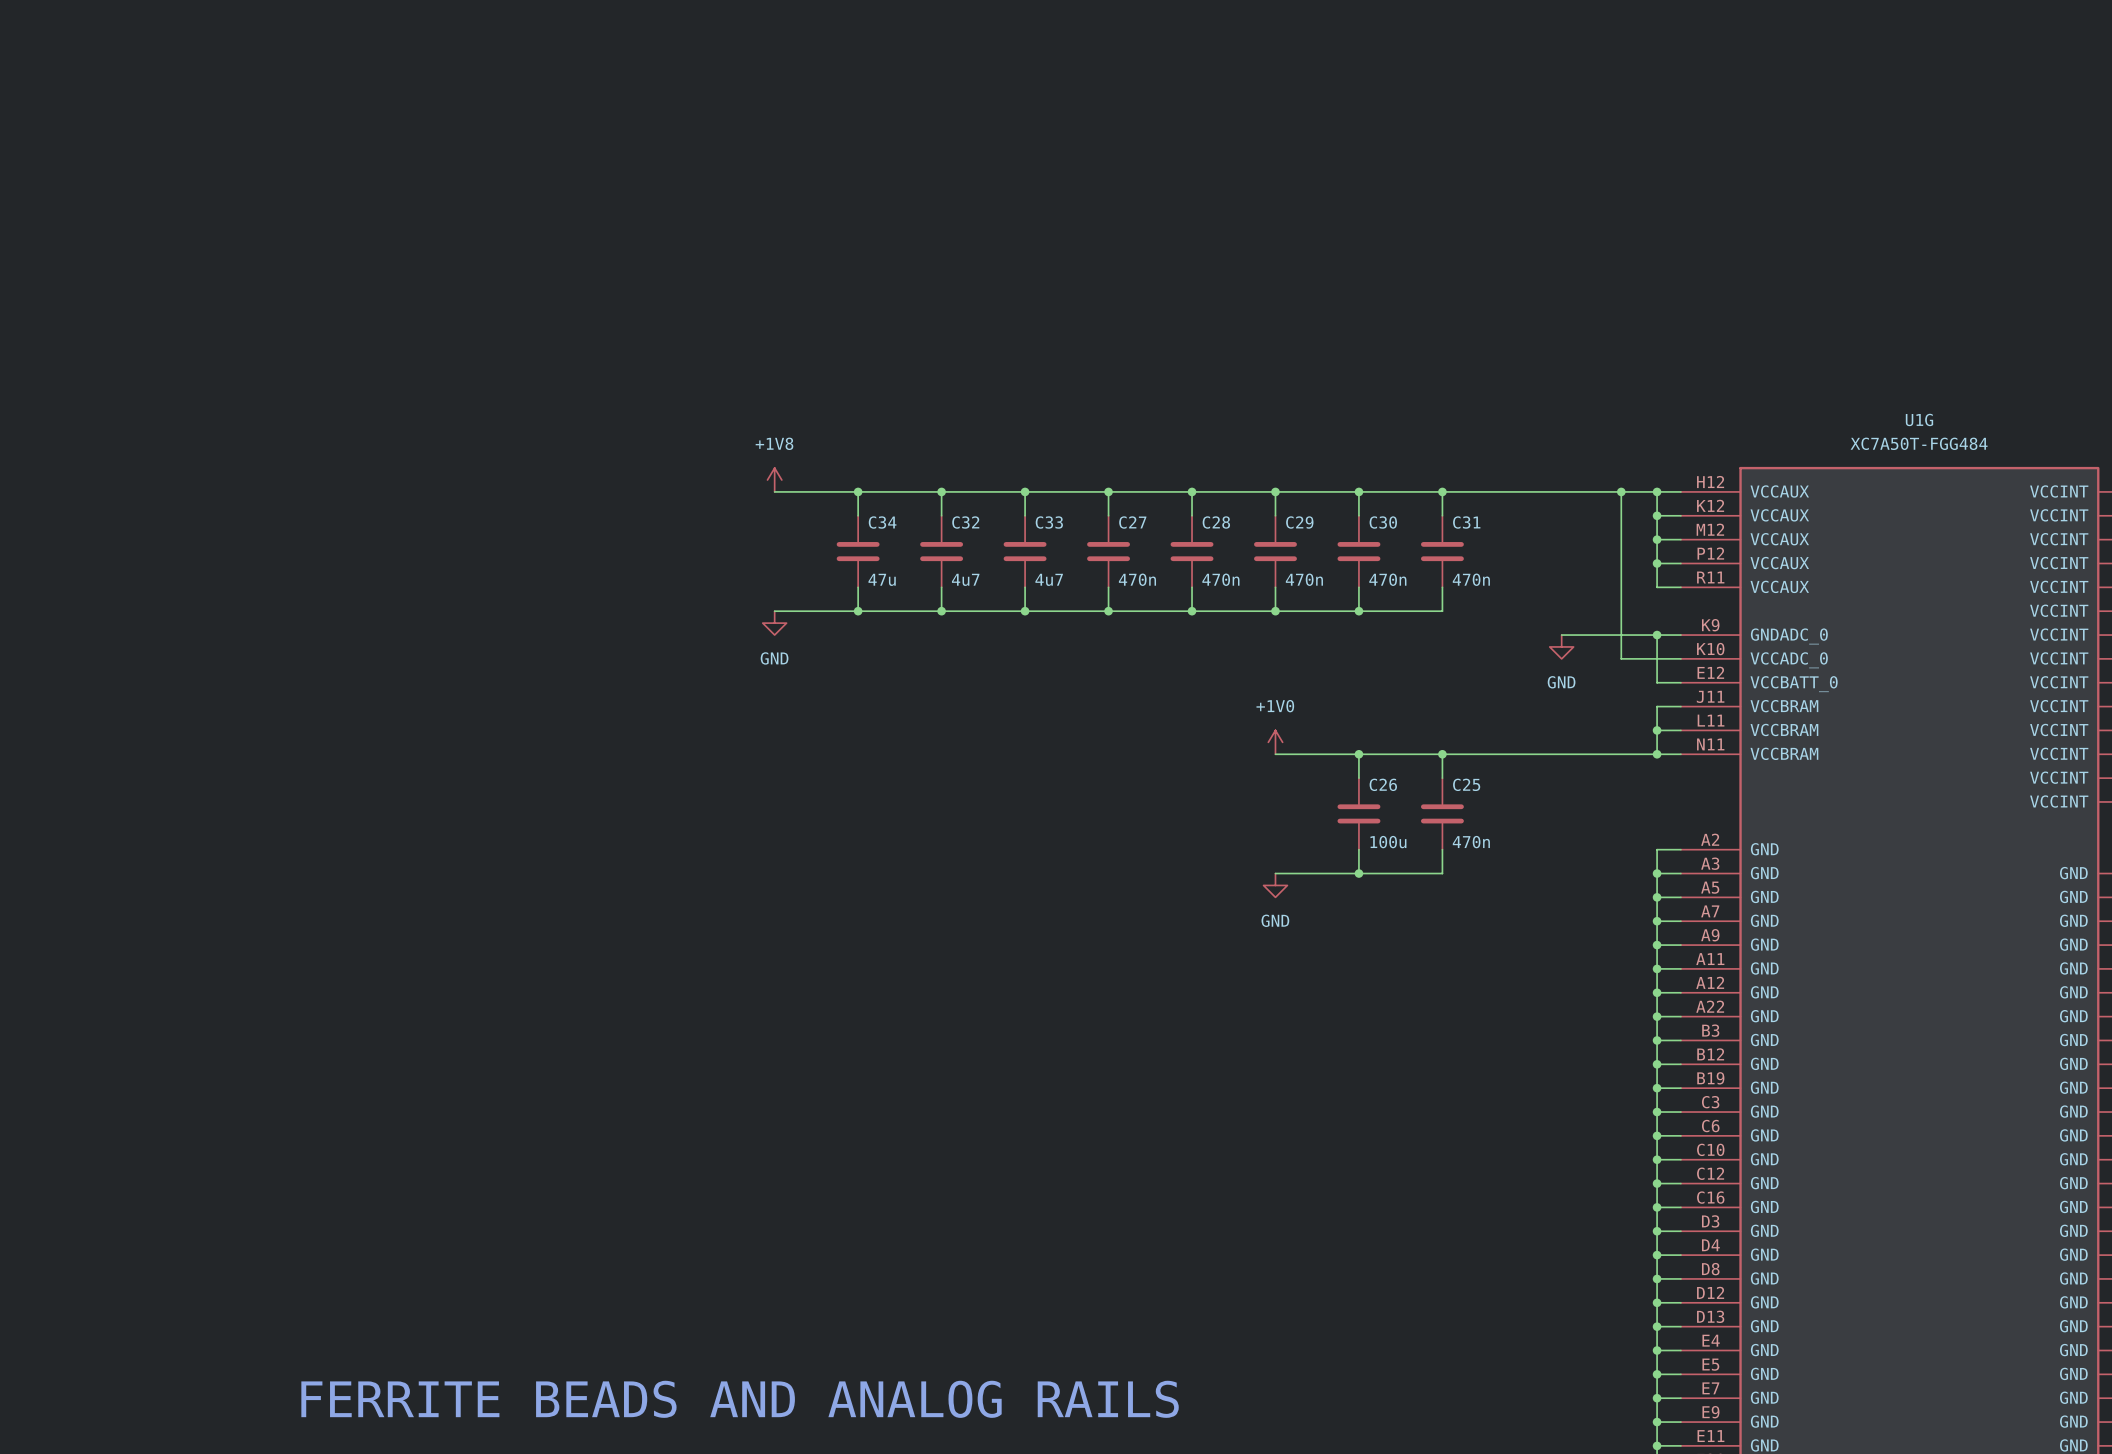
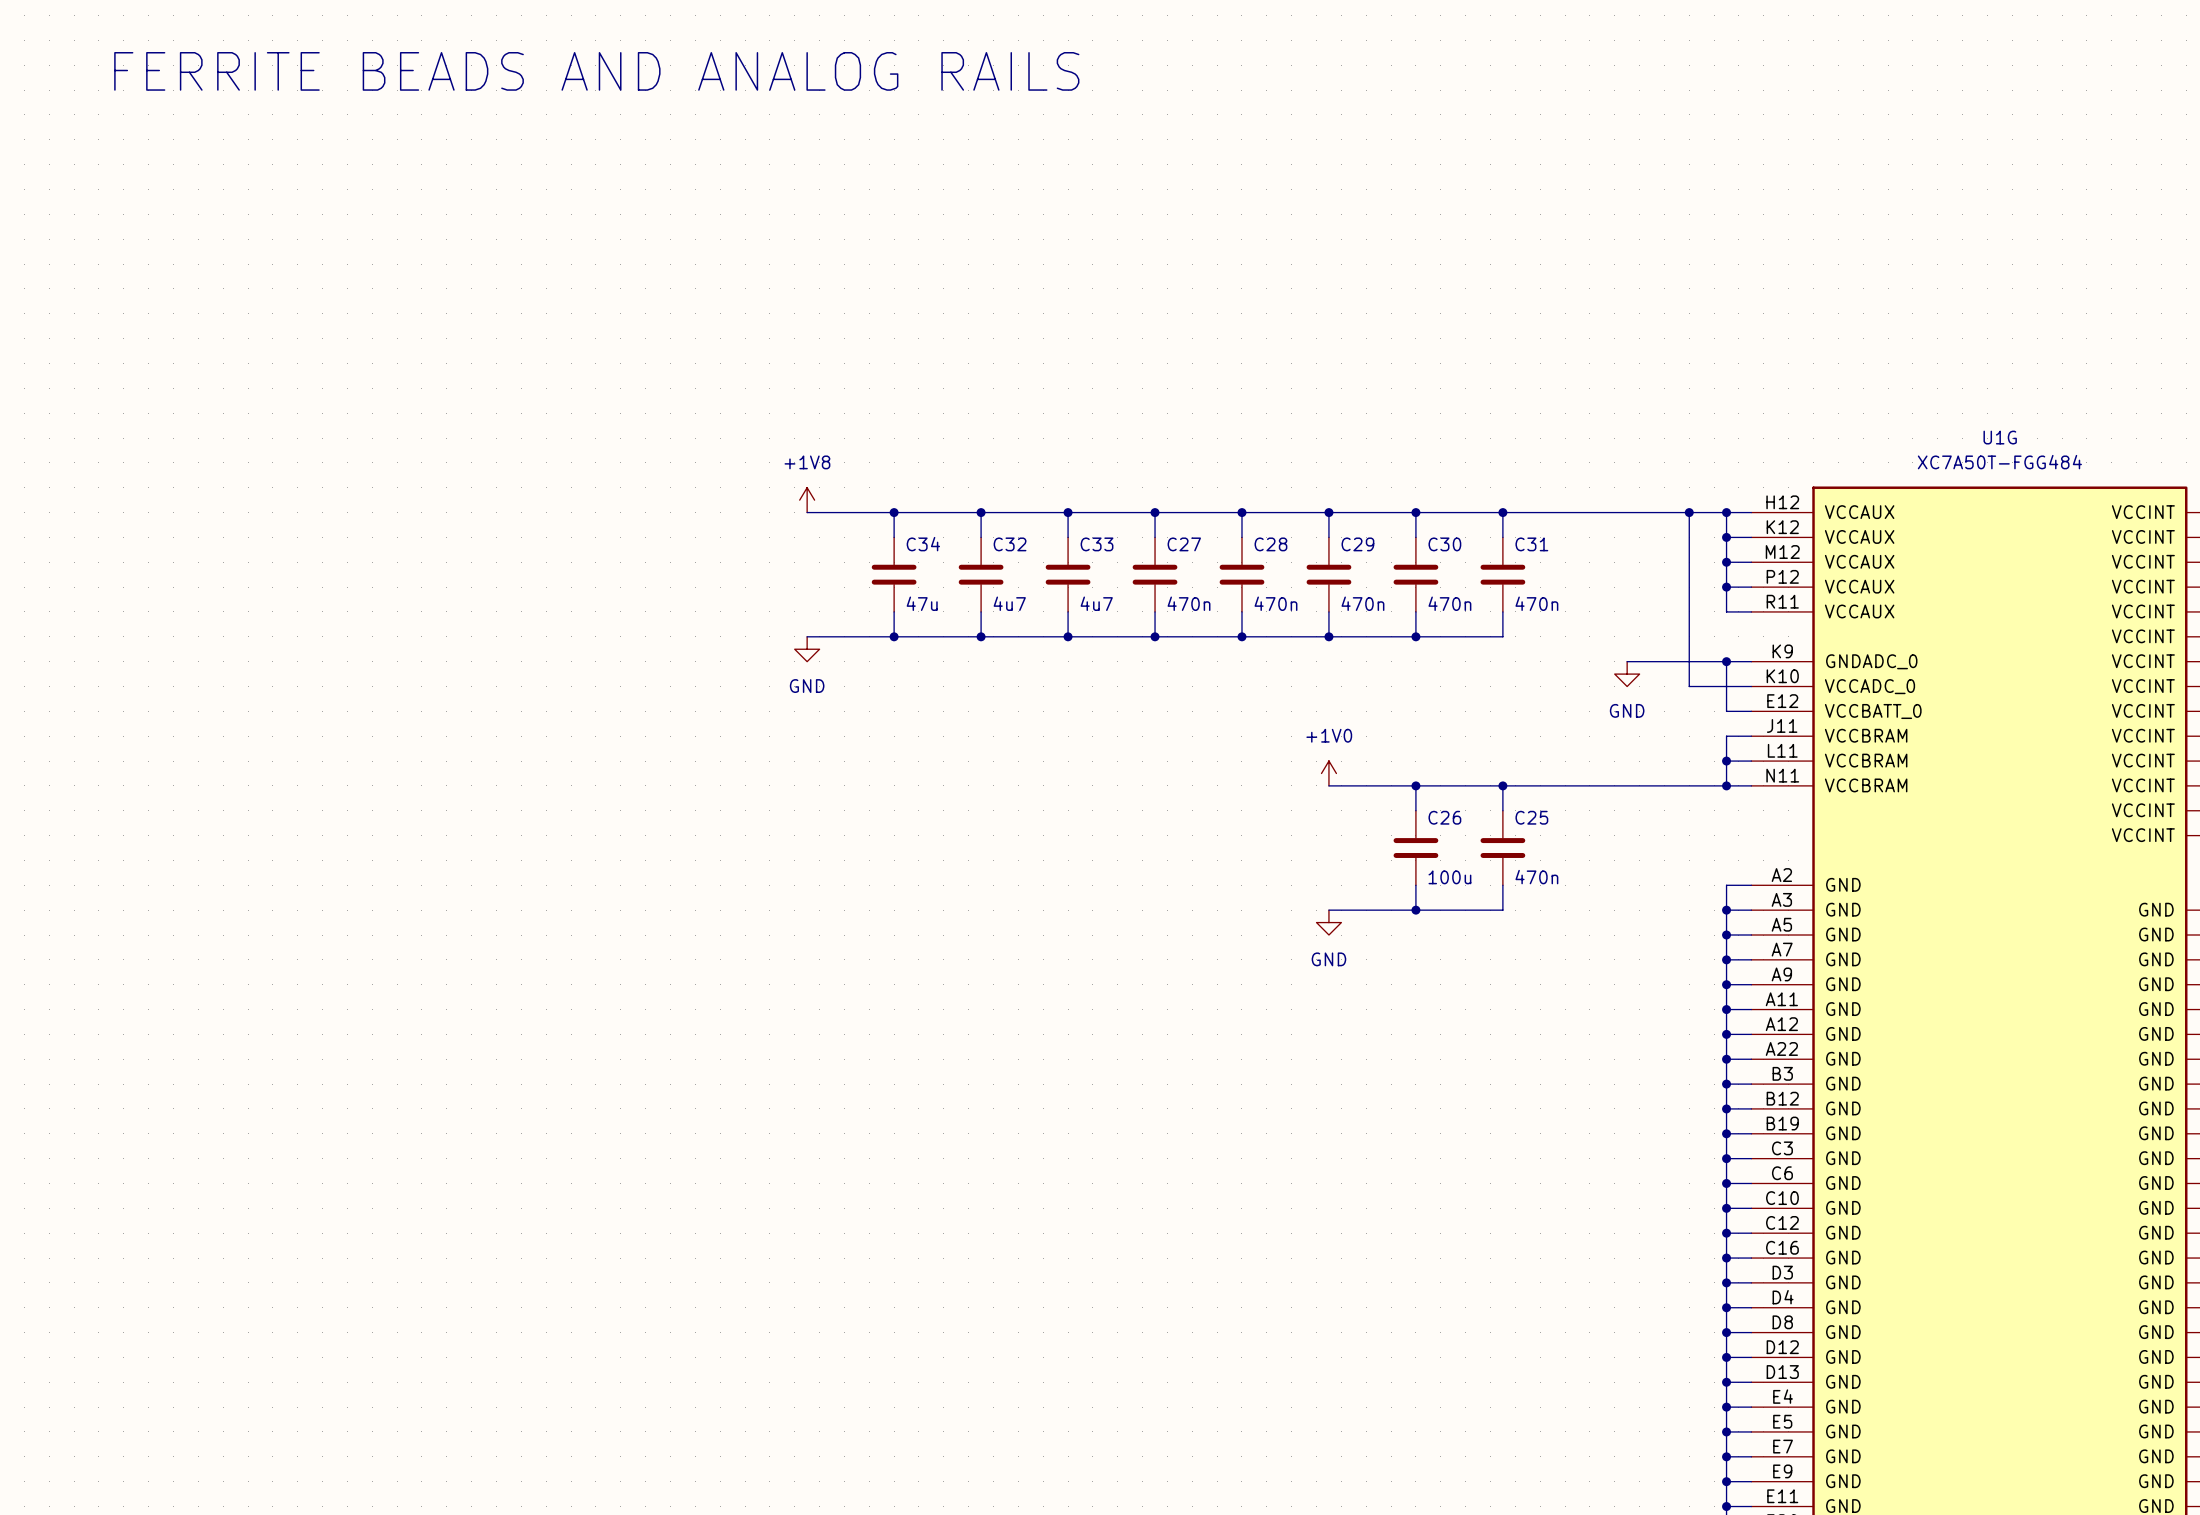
text: none -> FERRITE BEADS AND ANALOG RAILS (596, 71)
text: FERRITE BEADS AND ANALOG RAILS (740, 1399) -> none

